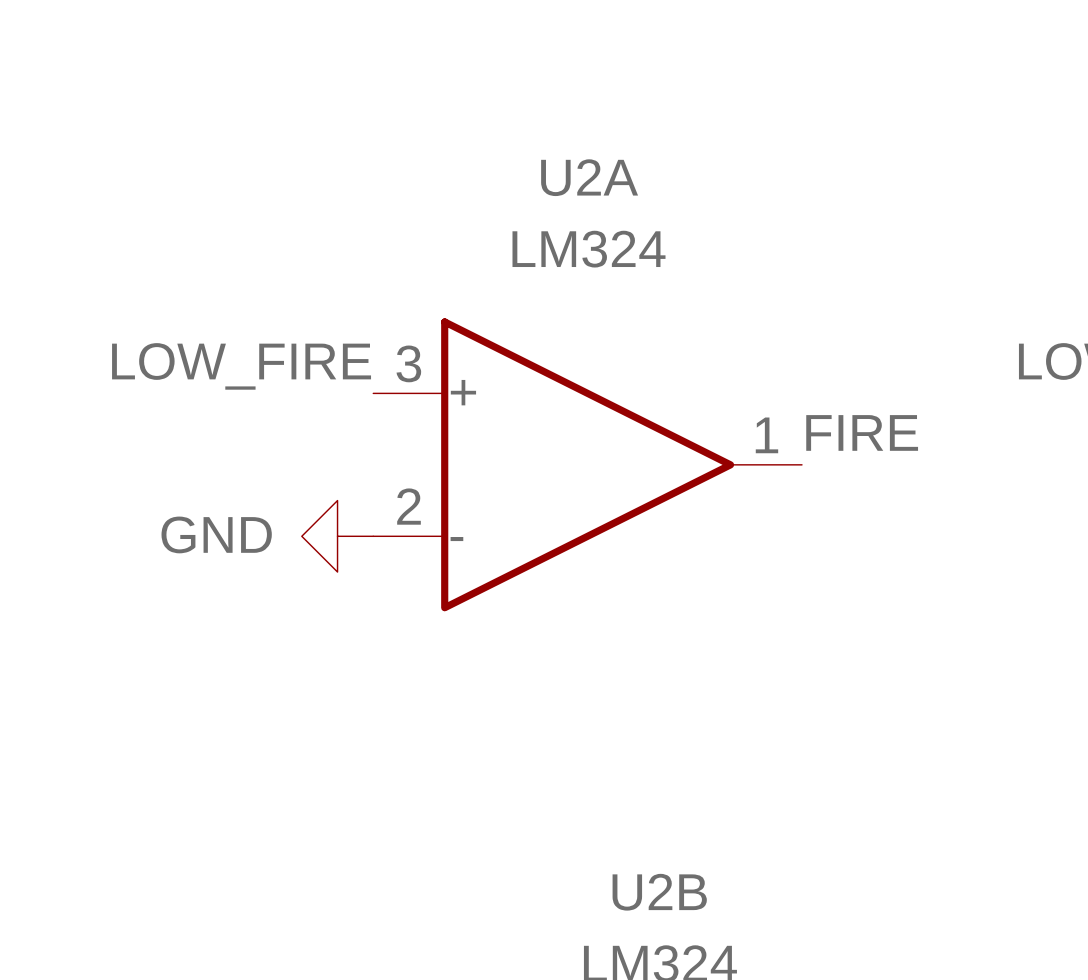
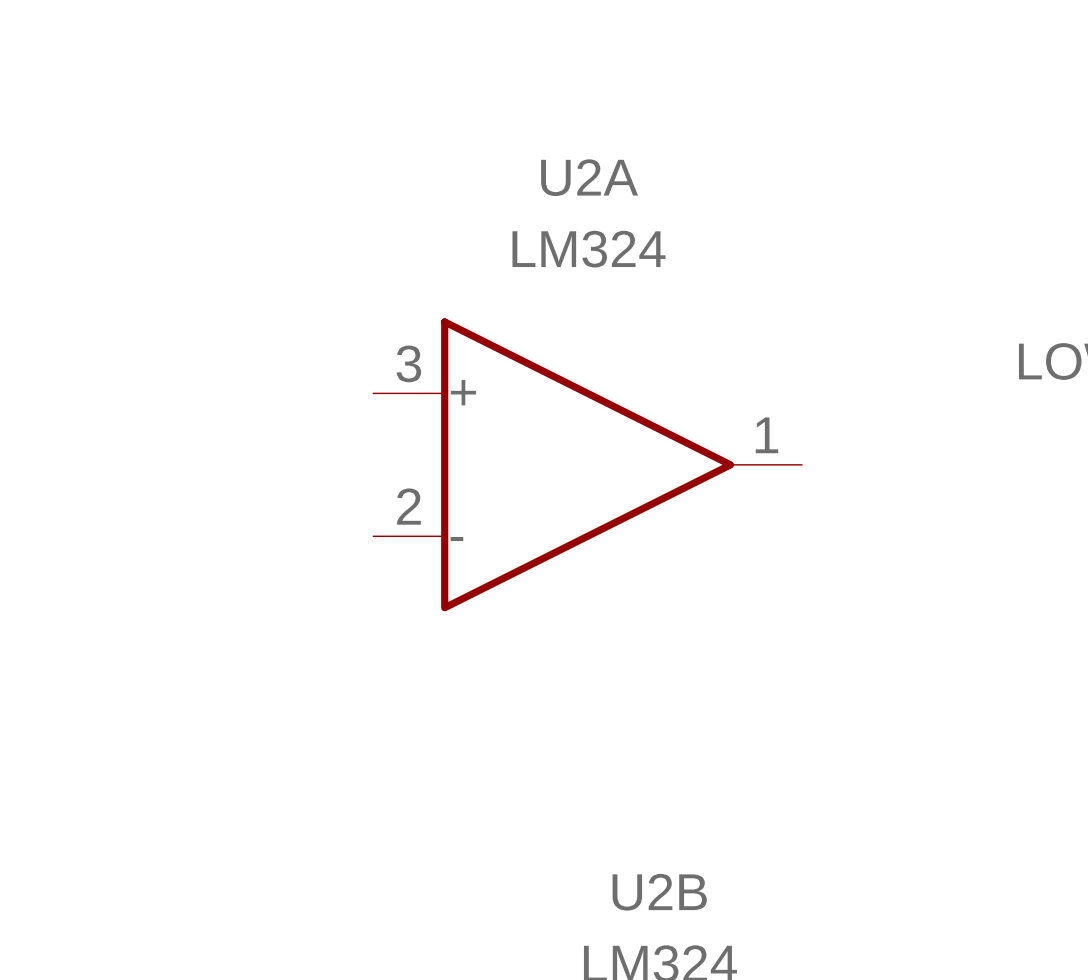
label: LOW_FIRE (241, 366) -> none
label: FIRE (862, 432) -> none
power symbol: GND (337, 536) -> none

